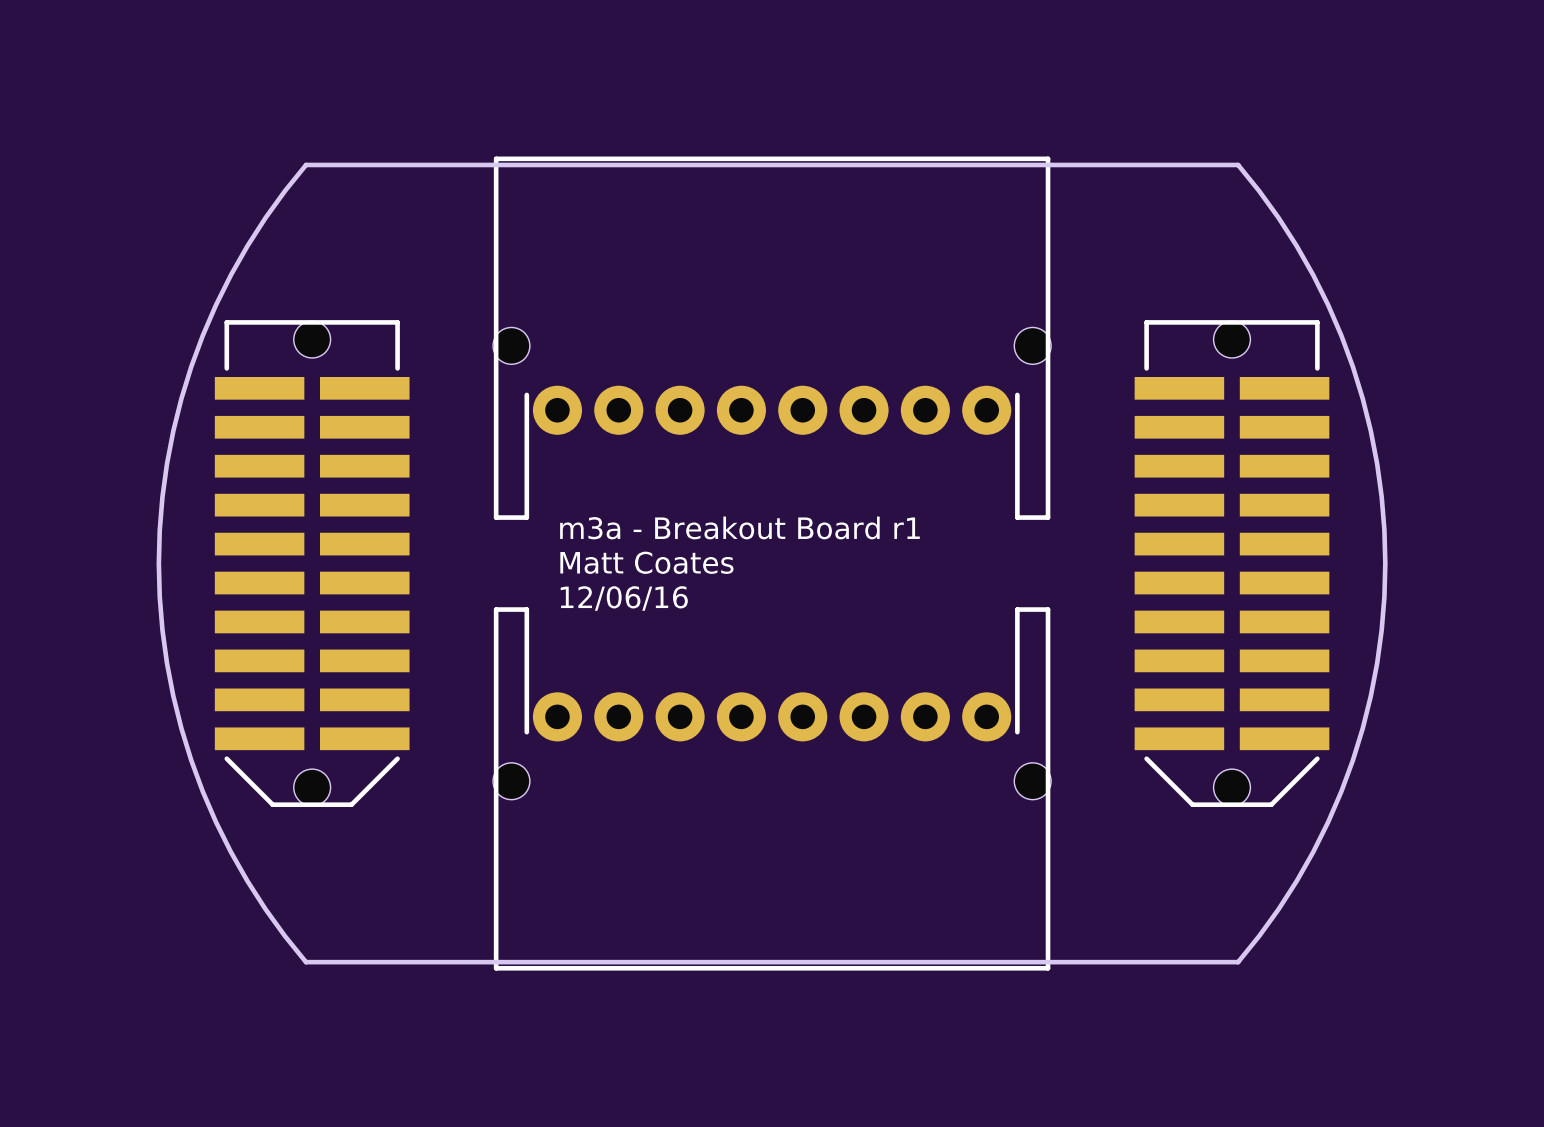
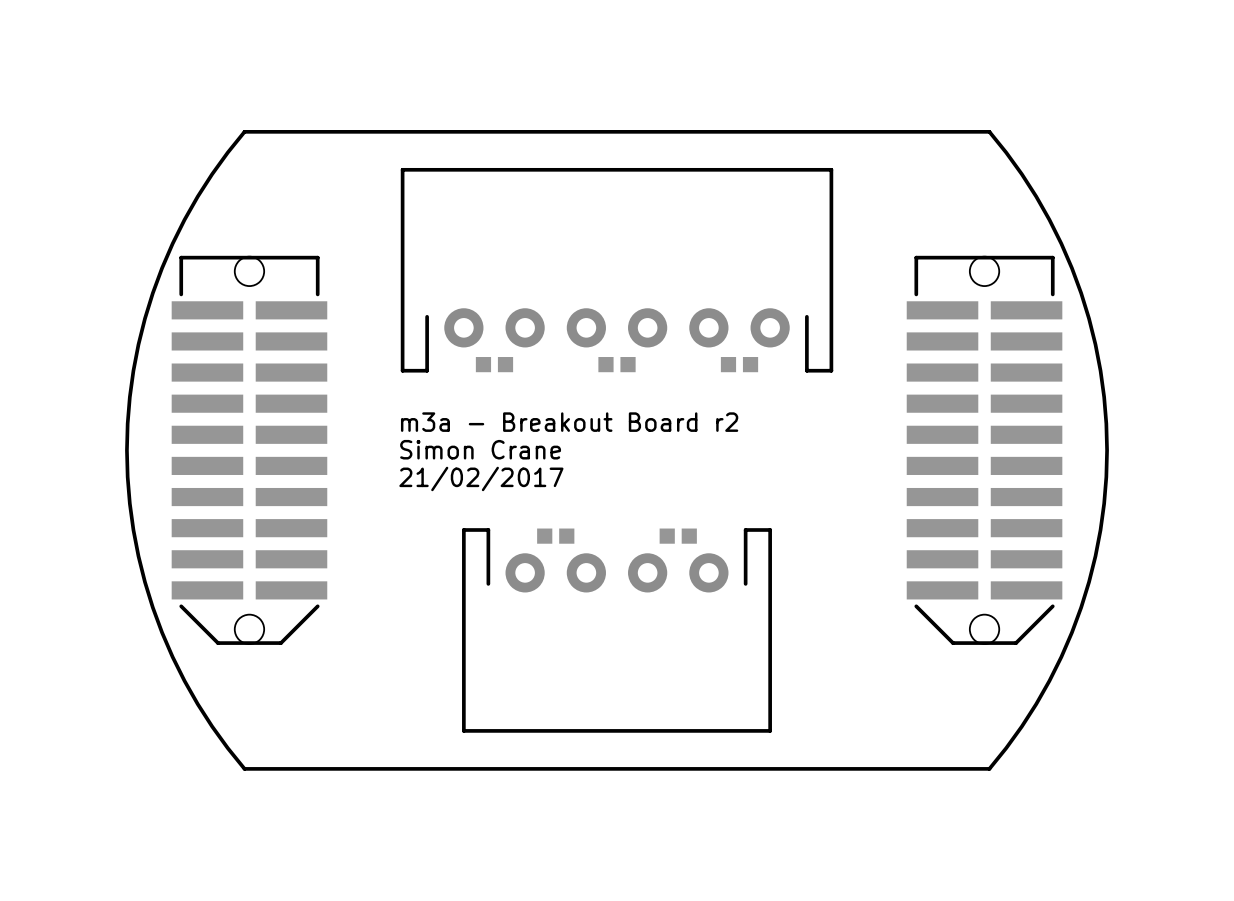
part footprint: [493, 156, 1052, 520] -> [400, 167, 834, 373]
part: none -> (494, 364)
part: none -> (617, 364)
part: none -> (739, 364)
text: m3a - Breakout Board r1 (739, 527) -> m3a - Breakout Board r2 (569, 422)
text: none -> Simon Crane (480, 449)
text: Matt Coates (646, 562) -> none
text: none -> 21/02/2017 (481, 478)
text: 12/06/16 (624, 598) -> none
part footprint: [493, 607, 1052, 971] -> [462, 528, 772, 733]
part: none -> (555, 536)
part: none -> (678, 536)

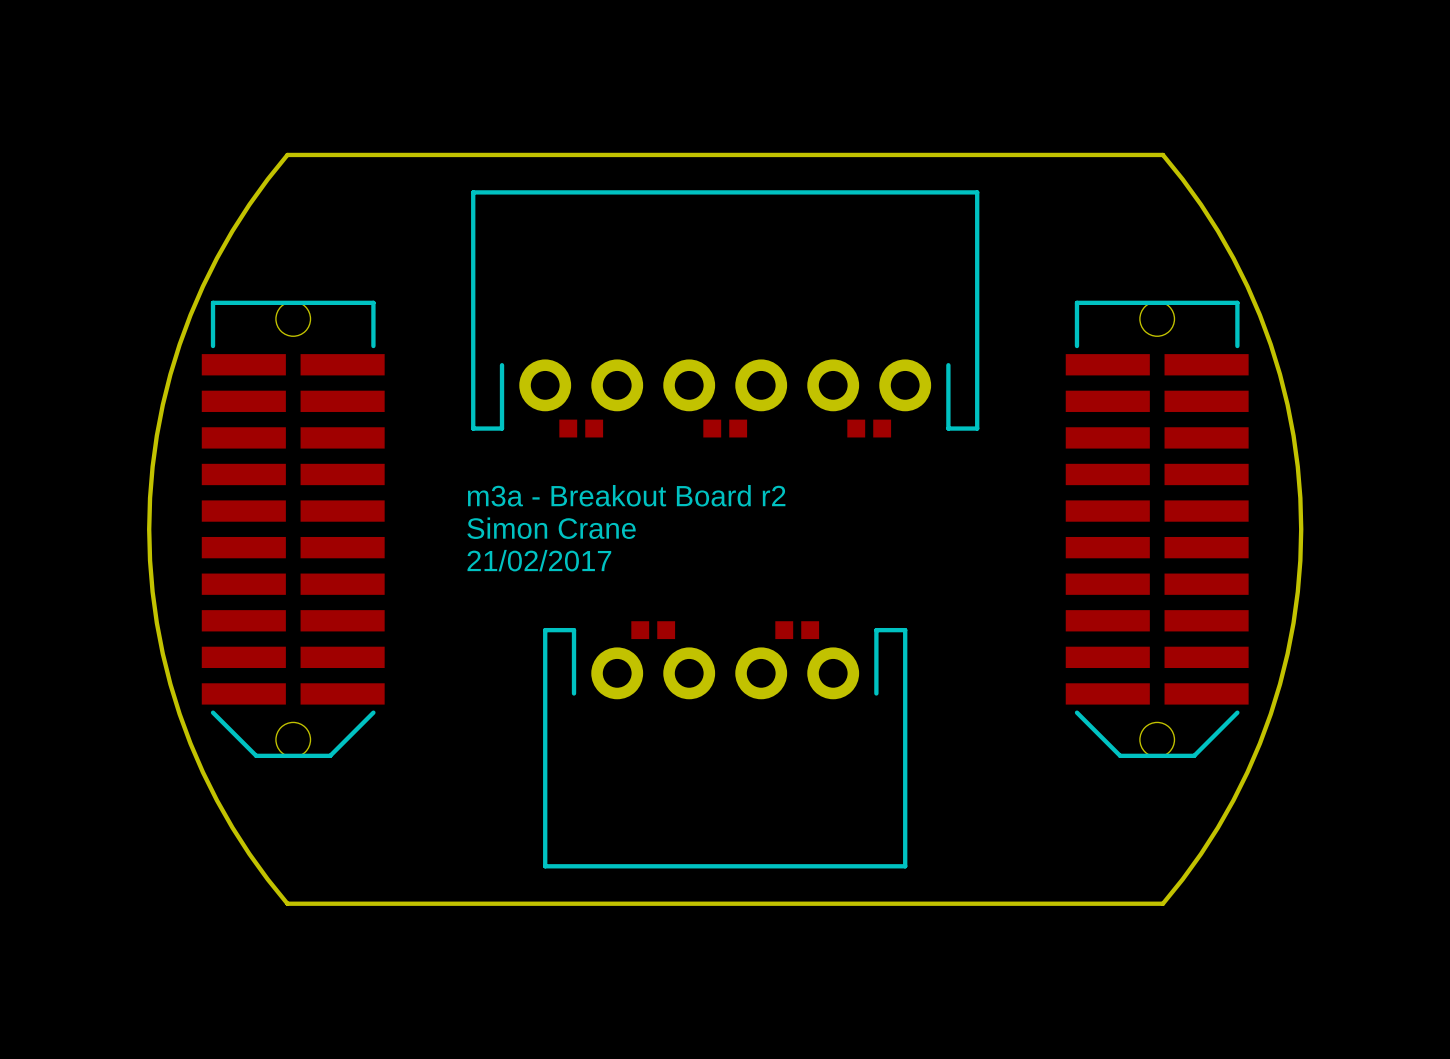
part footprint: [400, 167, 834, 373] -> [471, 190, 980, 431]
part footprint: [462, 528, 772, 733] -> [543, 627, 908, 869]

